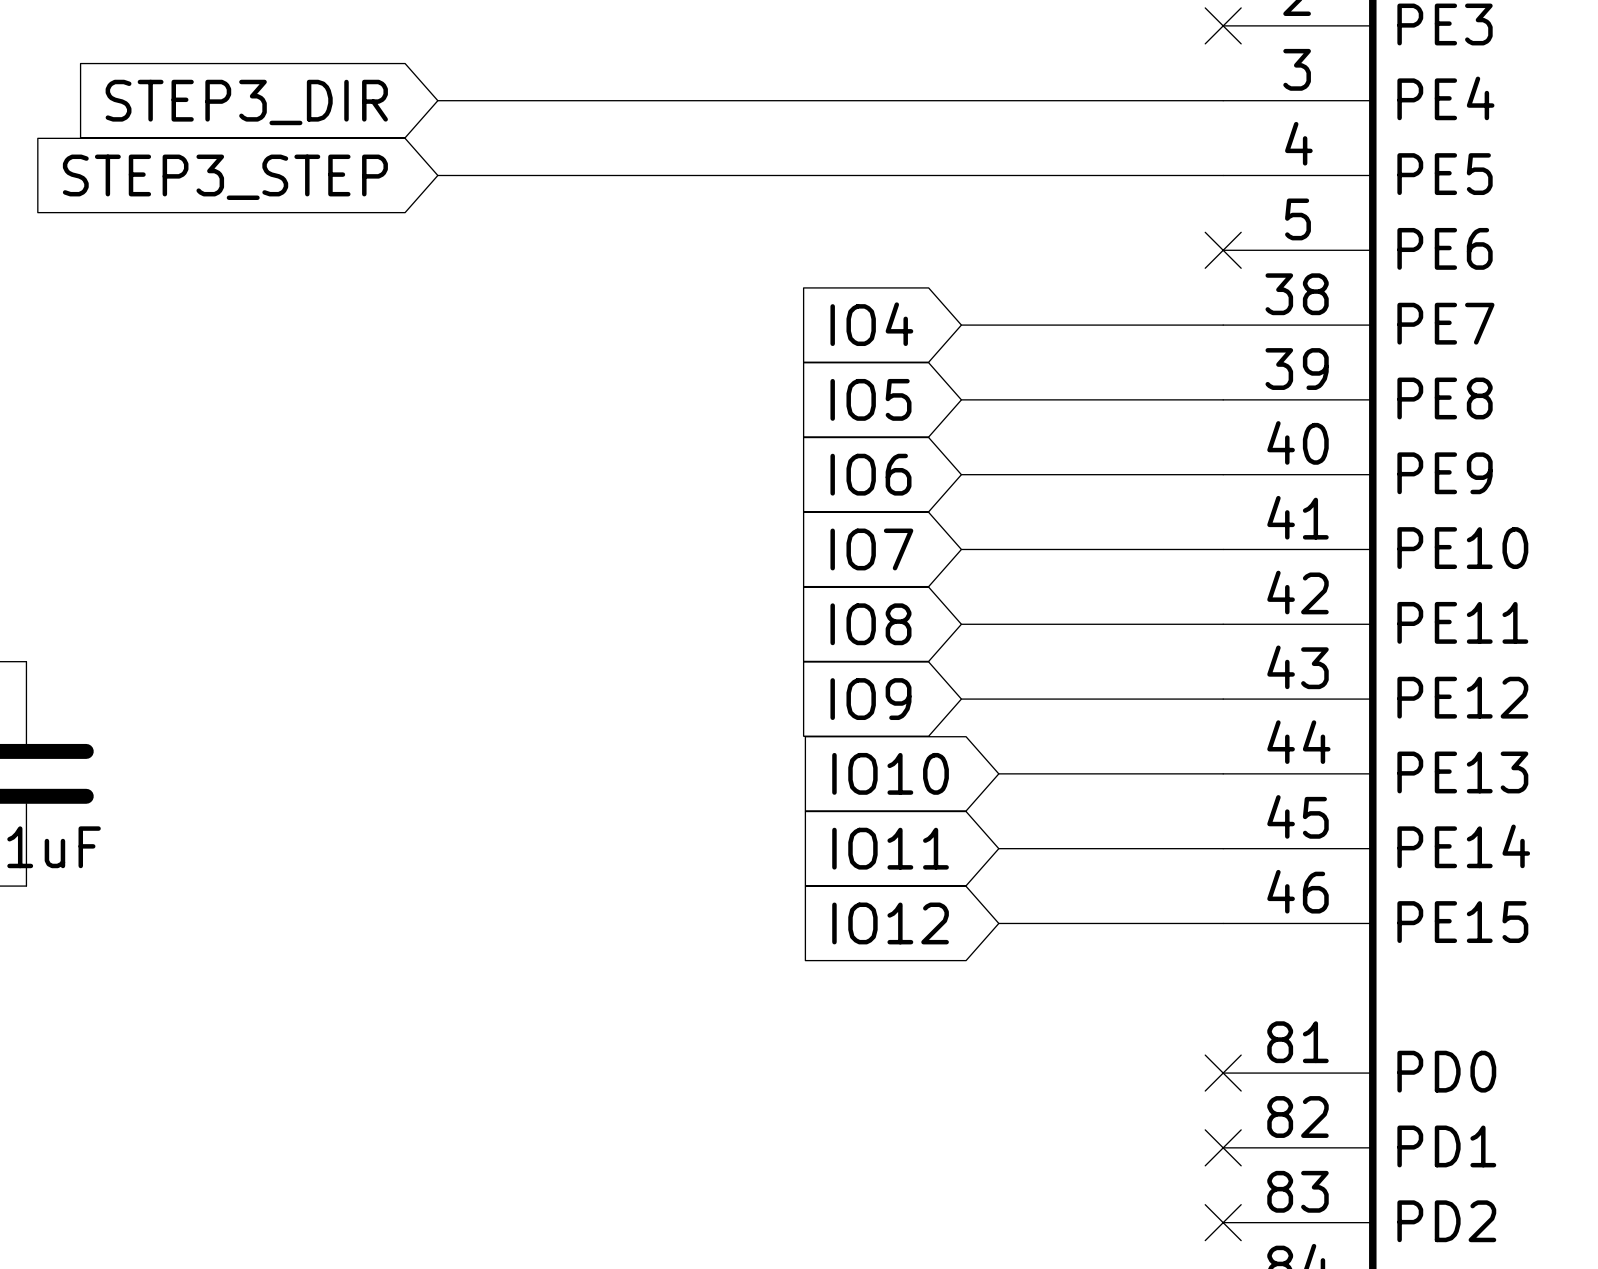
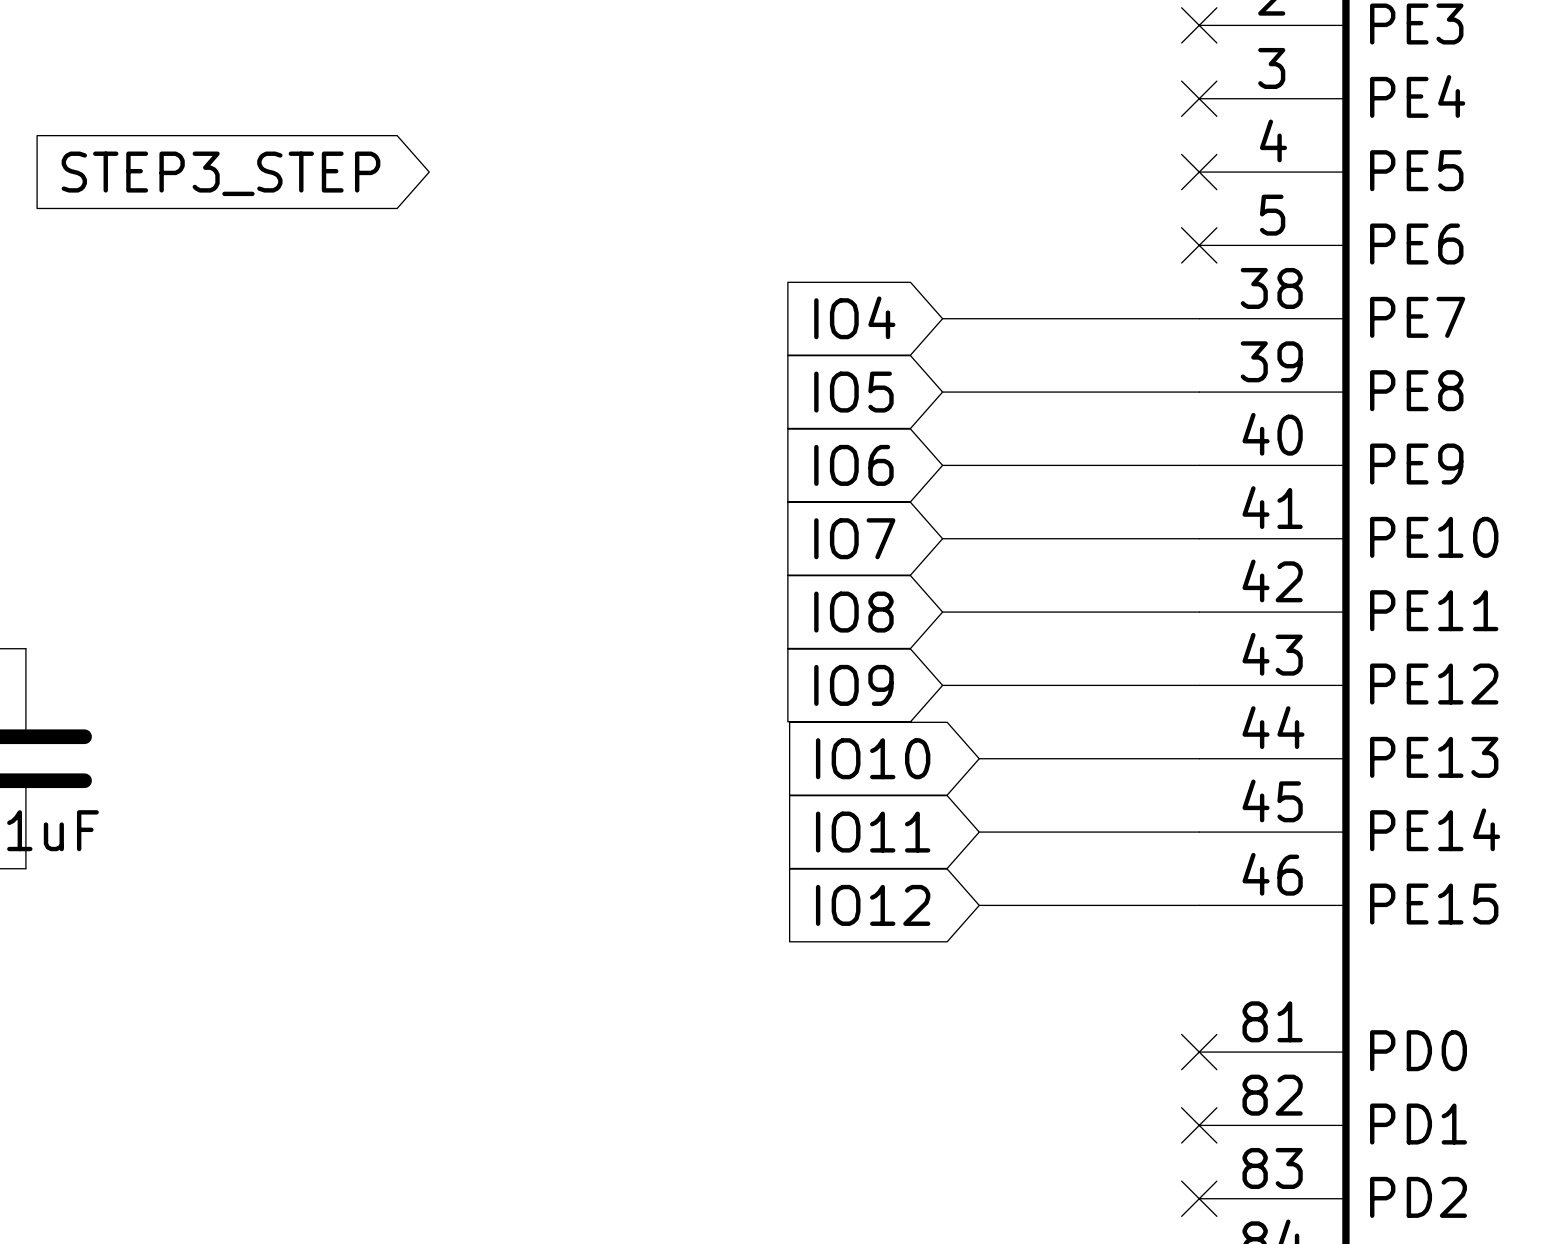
wire: (437, 100) (1223, 100) -> none
no-connect mark: none -> (1199, 98)
global label: STEP3_DIR (246, 102) -> none
wire: (437, 175) (1223, 175) -> none
no-connect mark: none -> (1199, 172)

